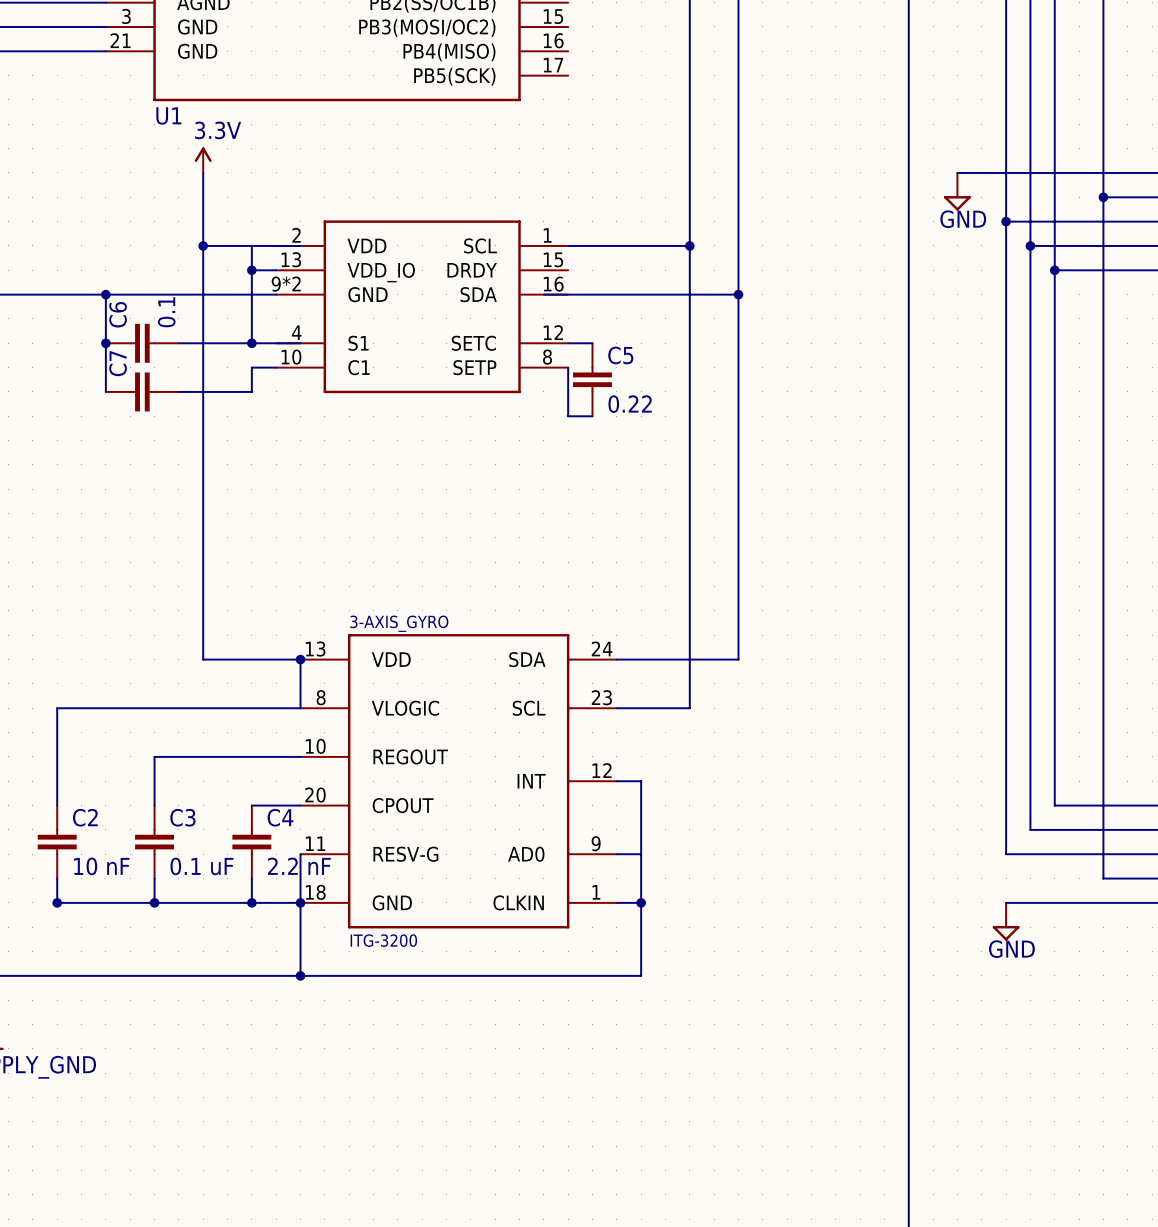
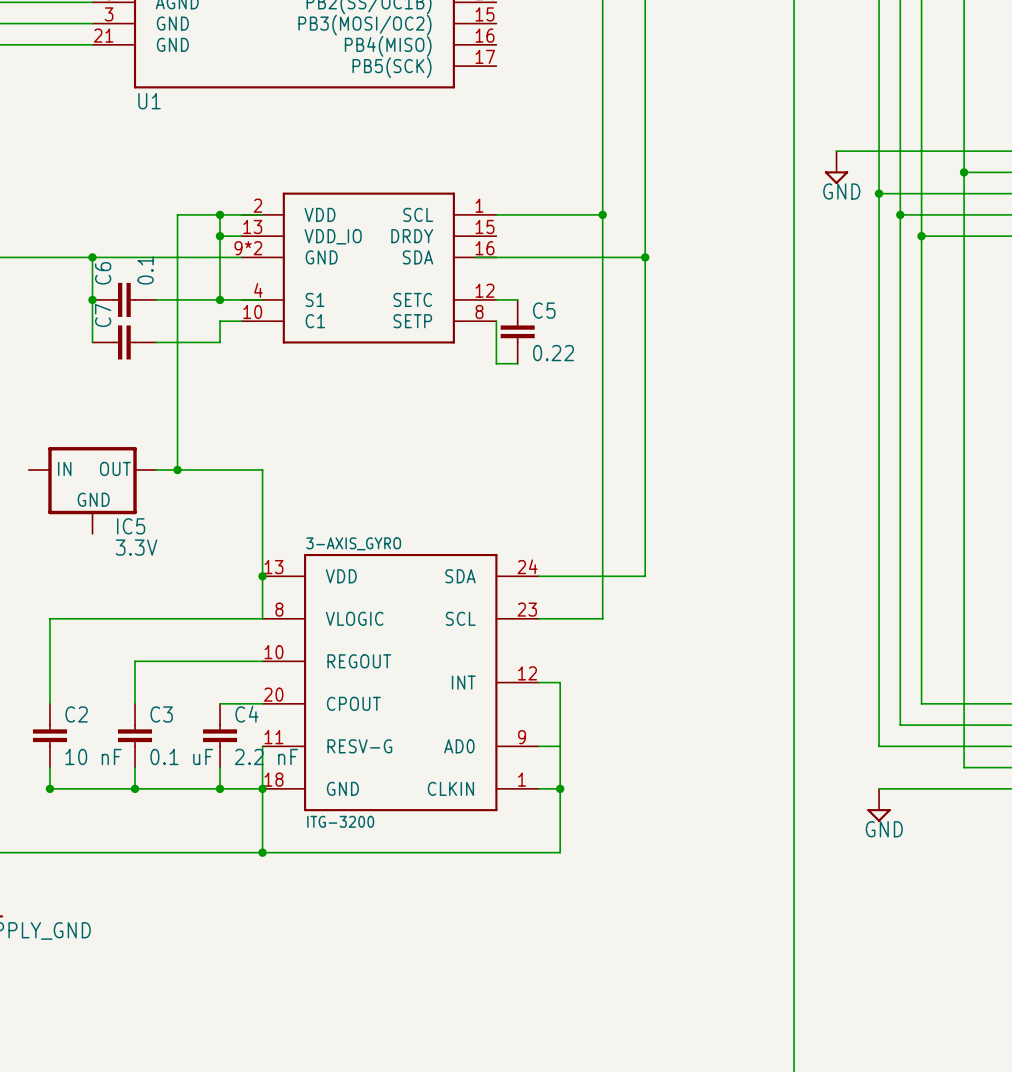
power symbol: 3.3V (203, 160) -> none
wire: (203, 172) (203, 245) -> none
junction position: (203, 245) -> (220, 214)
wire: (203, 537) (203, 659) (300, 659) -> (156, 470) (262, 470) (262, 576)
junction: none -> (177, 470)
IC5: none -> 3.3V (92, 490)

